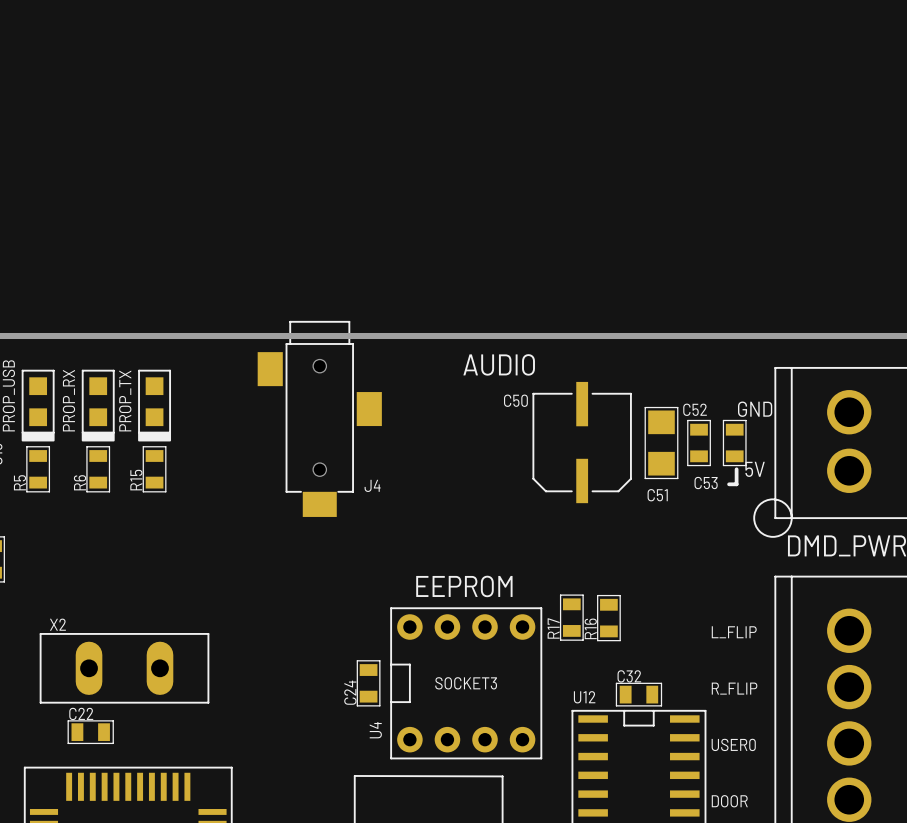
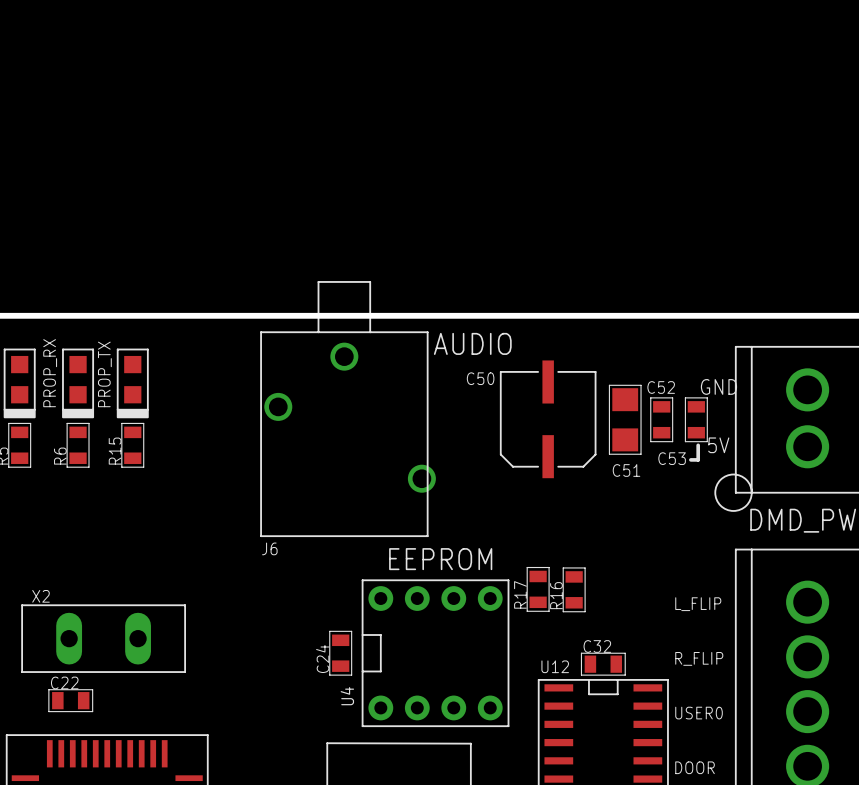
J4: (319, 418) -> none
J6: none -> (348, 409)
SOCKET3: (466, 683) -> none

